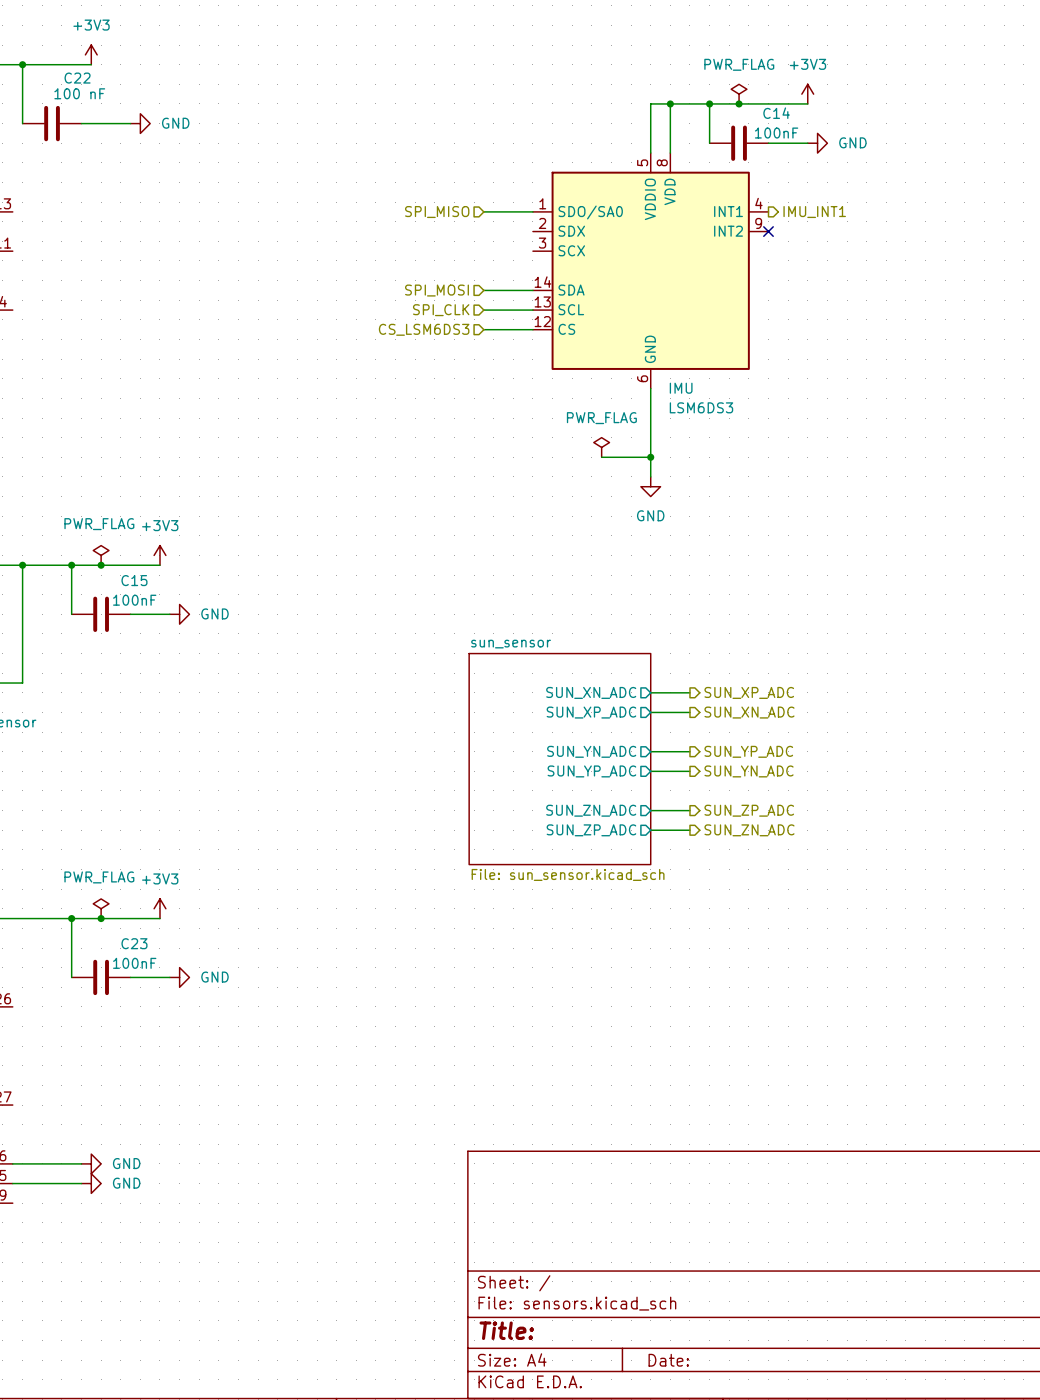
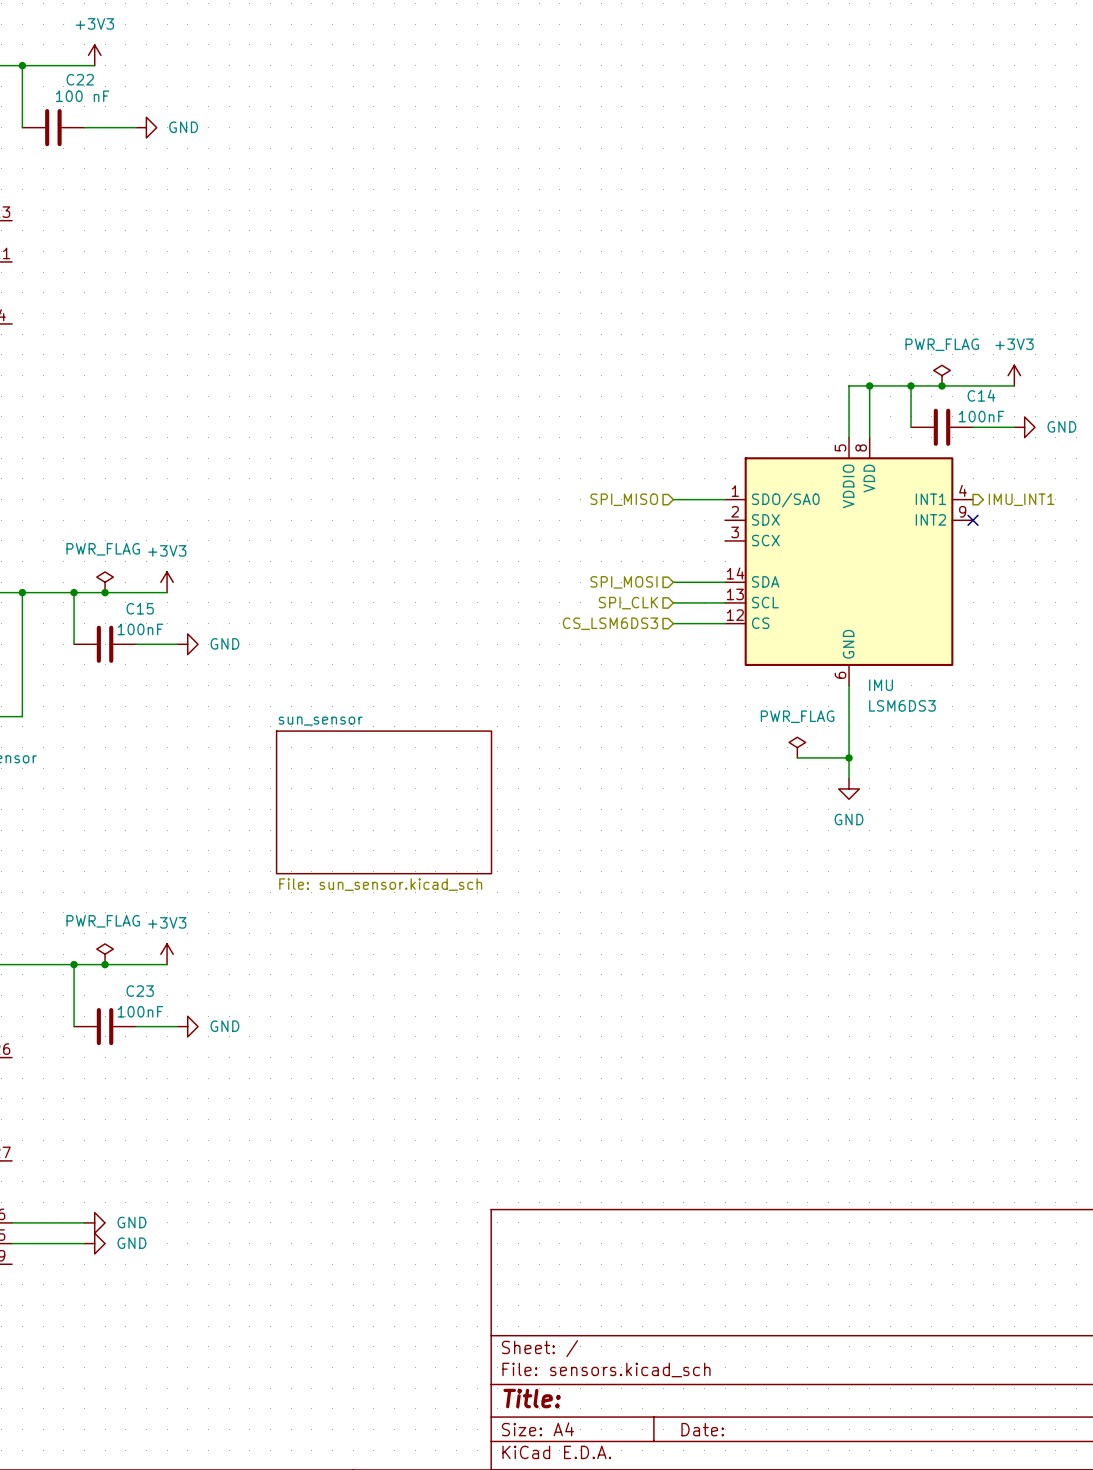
power symbol: PWR_FLAG (739, 94) -> none
power symbol: +3V3 (807, 94) -> none
wire: (670, 103) (670, 153) -> none
junction: (670, 103) -> none
wire: (709, 103) (709, 143) -> none
junction: (709, 103) -> none
junction: (739, 103) -> none
wire: (807, 103) (650, 103) (650, 153) -> none
C14 position: (739, 143) -> (942, 427)
wire: (768, 143) (807, 143) -> none
power symbol: GND (817, 143) -> none
wire: (483, 211) (532, 211) -> none
hierarchical label: SPI_MISO (437, 212) -> none
hierarchical label: IMU_INT1 (814, 212) -> none
no-connect mark: (768, 231) -> none
IMU: LSM6DS3 (650, 270) -> none
hierarchical label: SPI_MOSI (436, 290) -> none
wire: (483, 290) (532, 290) -> none
hierarchical label: SPI_CLK (441, 310) -> none
wire: (483, 310) (532, 310) -> none
hierarchical label: CS_LSM6DS3 (424, 329) -> none
wire: (483, 329) (532, 329) -> none
power symbol: none -> PWR_FLAG (942, 375)
power symbol: none -> +3V3 (1014, 375)
wire: none -> (869, 385) (869, 437)
junction: none -> (869, 385)
wire: none -> (911, 385) (911, 427)
junction: none -> (911, 385)
junction: none -> (942, 385)
wire: none -> (1014, 385) (849, 385) (849, 437)
wire: (650, 388) (650, 476) -> none
wire: none -> (973, 427) (1014, 427)
power symbol: none -> GND (1024, 427)
power symbol: PWR_FLAG (601, 447) -> none
wire: (601, 457) (650, 457) -> (673, 499) (725, 499)
junction: (650, 457) -> none
hierarchical label: none -> SPI_MISO (624, 499)
hierarchical label: none -> IMU_INT1 (1021, 499)
power symbol: GND (650, 486) -> none
no-connect mark: none -> (973, 520)
IMU: none -> LSM6DS3 (849, 561)
hierarchical label: none -> SPI_MOSI (623, 582)
wire: none -> (673, 582) (725, 582)
hierarchical label: none -> SPI_CLK (628, 603)
wire: none -> (673, 602) (725, 602)
hierarchical label: none -> CS_LSM6DS3 (610, 623)
wire: none -> (673, 623) (725, 623)
wire: none -> (849, 685) (849, 778)
sheet pin: SUN_XN_ADC (591, 692) -> none
wire: (650, 692) (689, 692) -> none
hierarchical label: SUN_XP_ADC (749, 692) -> none
sheet pin: SUN_XP_ADC (591, 712) -> none
wire: (650, 712) (689, 712) -> none
hierarchical label: SUN_XN_ADC (749, 712) -> none
power symbol: none -> PWR_FLAG (797, 747)
wire: none -> (797, 757) (849, 757)
junction: none -> (849, 757)
sheet pin: SUN_YN_ADC (591, 751) -> none
wire: (650, 751) (689, 751) -> none
hierarchical label: SUN_YP_ADC (748, 751) -> none
power symbol: none -> GND (849, 788)
sheet sun_sensor: File: sun_sensor.kicad_sch (559, 759) -> none
sheet sun_sensor: none -> File: sun_sensor.kicad_sch (384, 802)
sheet pin: SUN_YP_ADC (591, 771) -> none
wire: (650, 771) (689, 771) -> none
hierarchical label: SUN_YN_ADC (749, 771) -> none
sheet pin: SUN_ZN_ADC (591, 810) -> none
wire: (650, 810) (689, 810) -> none
hierarchical label: SUN_ZP_ADC (749, 810) -> none
sheet pin: SUN_ZP_ADC (591, 830) -> none
wire: (650, 830) (689, 830) -> none
hierarchical label: SUN_ZN_ADC (749, 830) -> none

